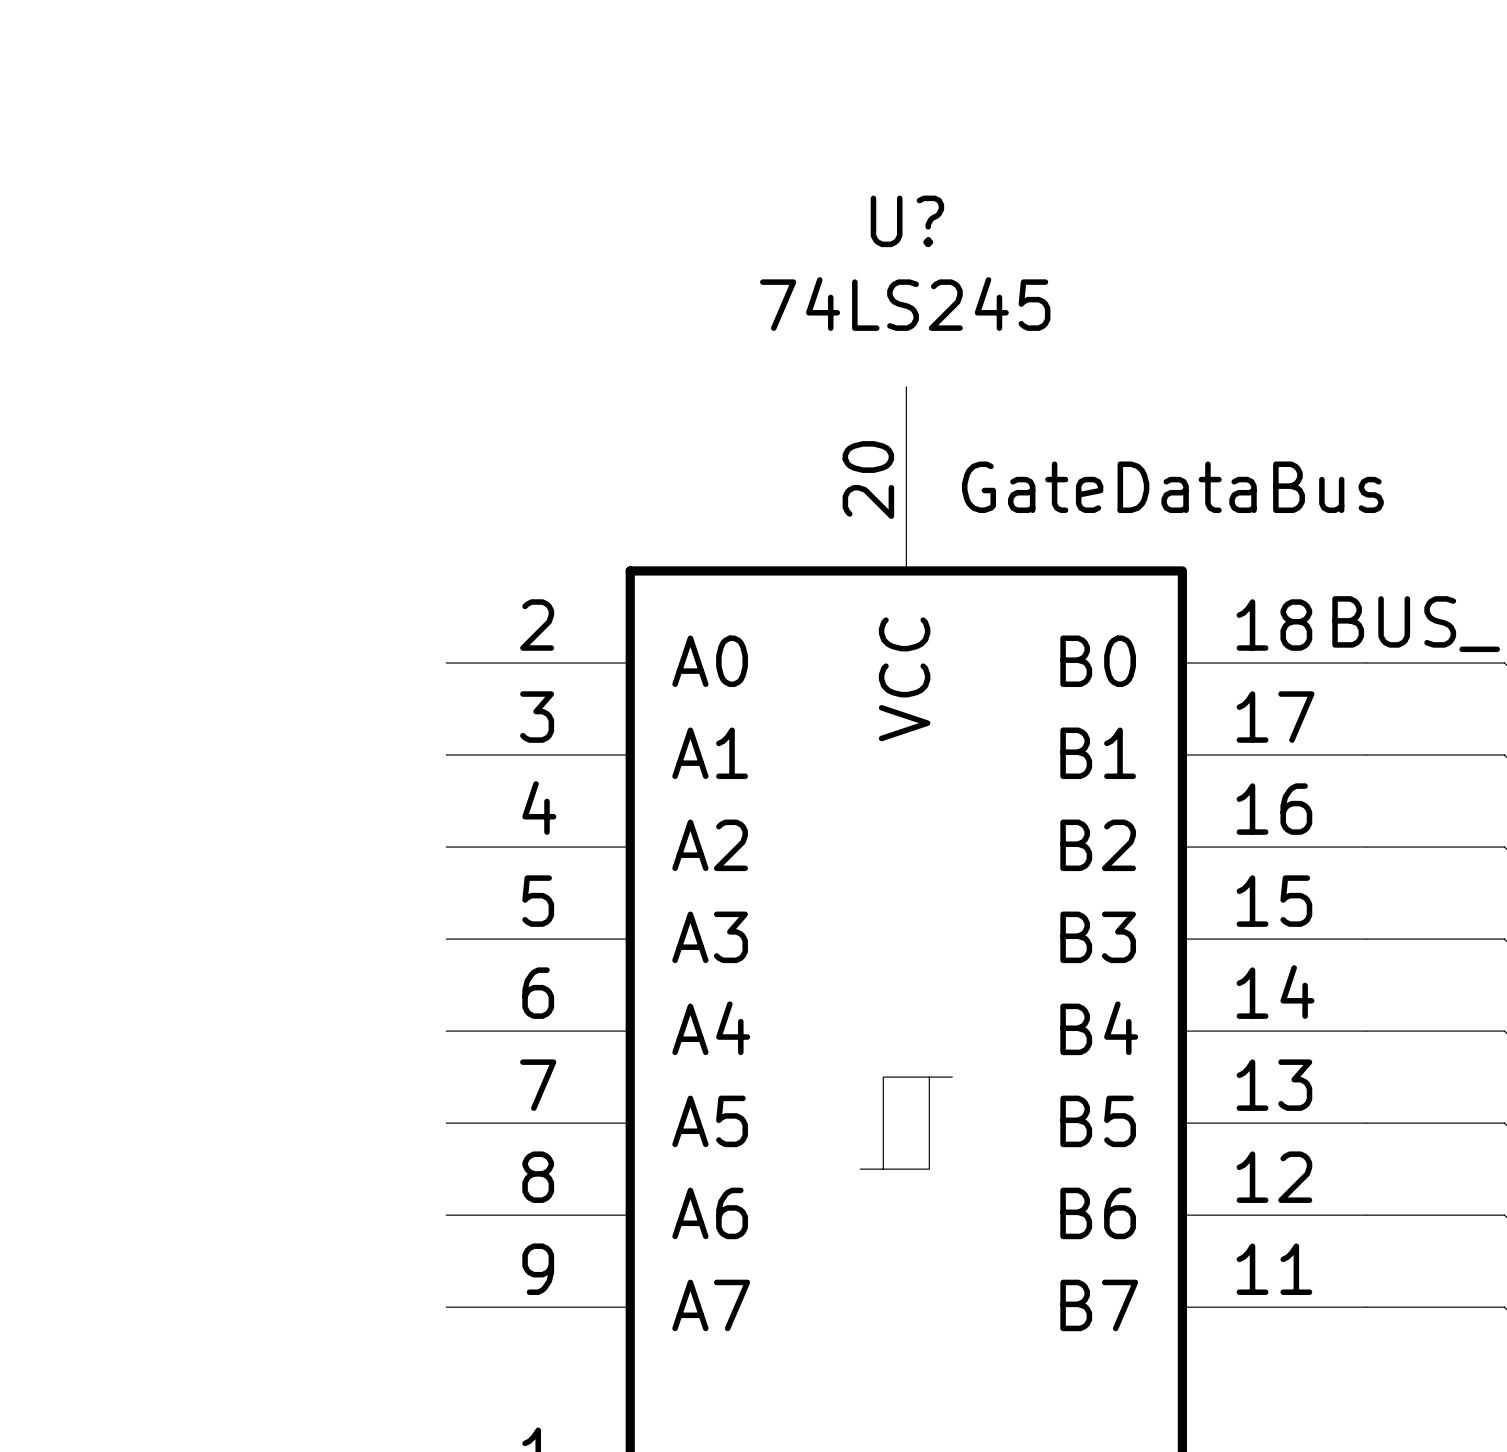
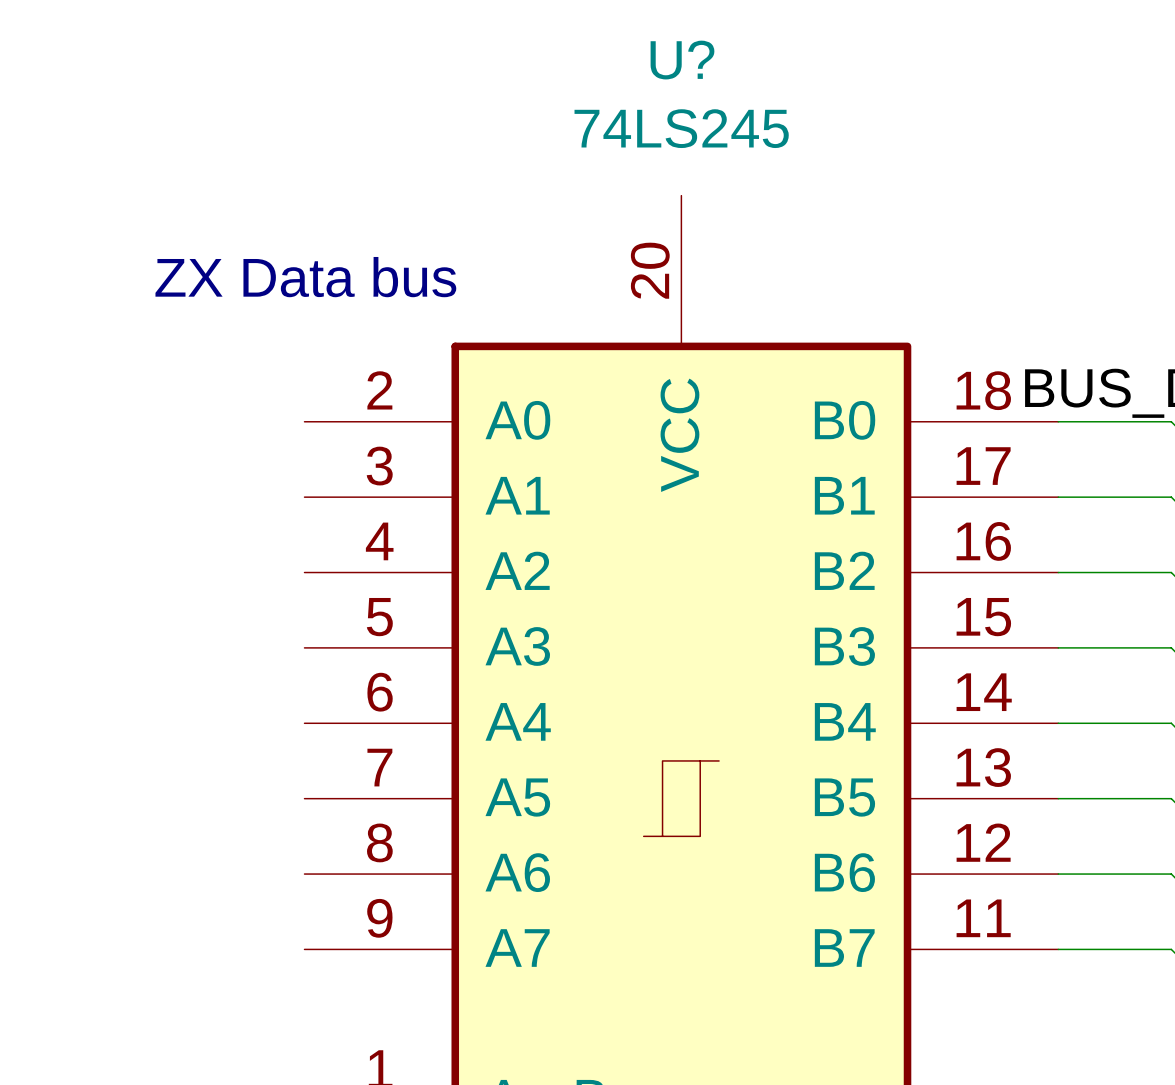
text: none -> ZX Data bus (305, 277)
text: GateDataBus (1172, 487) -> none

